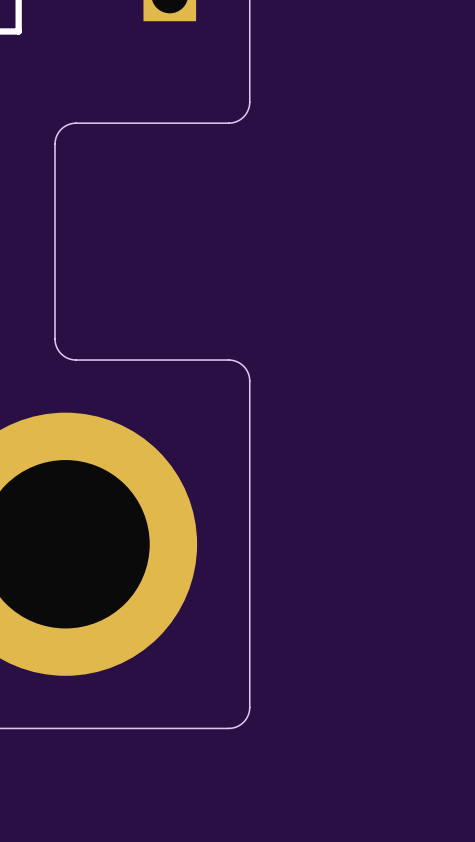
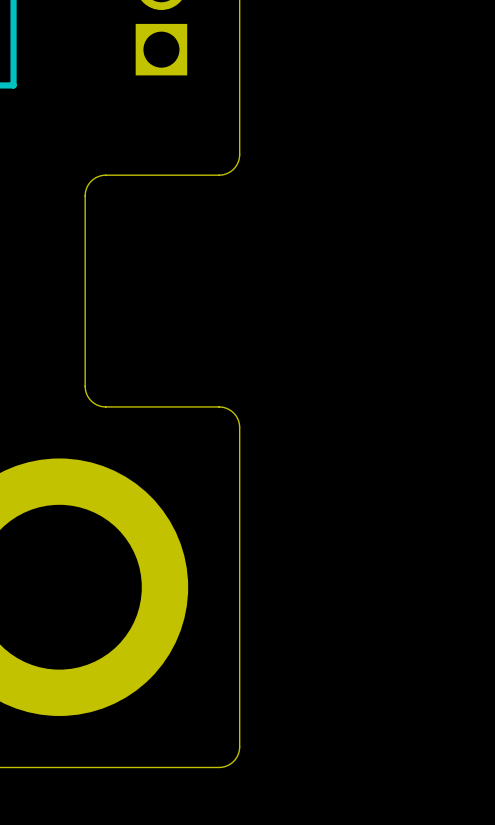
board edge: (112, 123) (68, 124) (59, 131) (55, 144) (55, 343) (61, 353) (71, 359) (112, 360) -> (105, 175) (97, 176) (91, 181) (86, 187) (85, 195) (85, 388) (91, 400) (96, 404) (105, 406)

